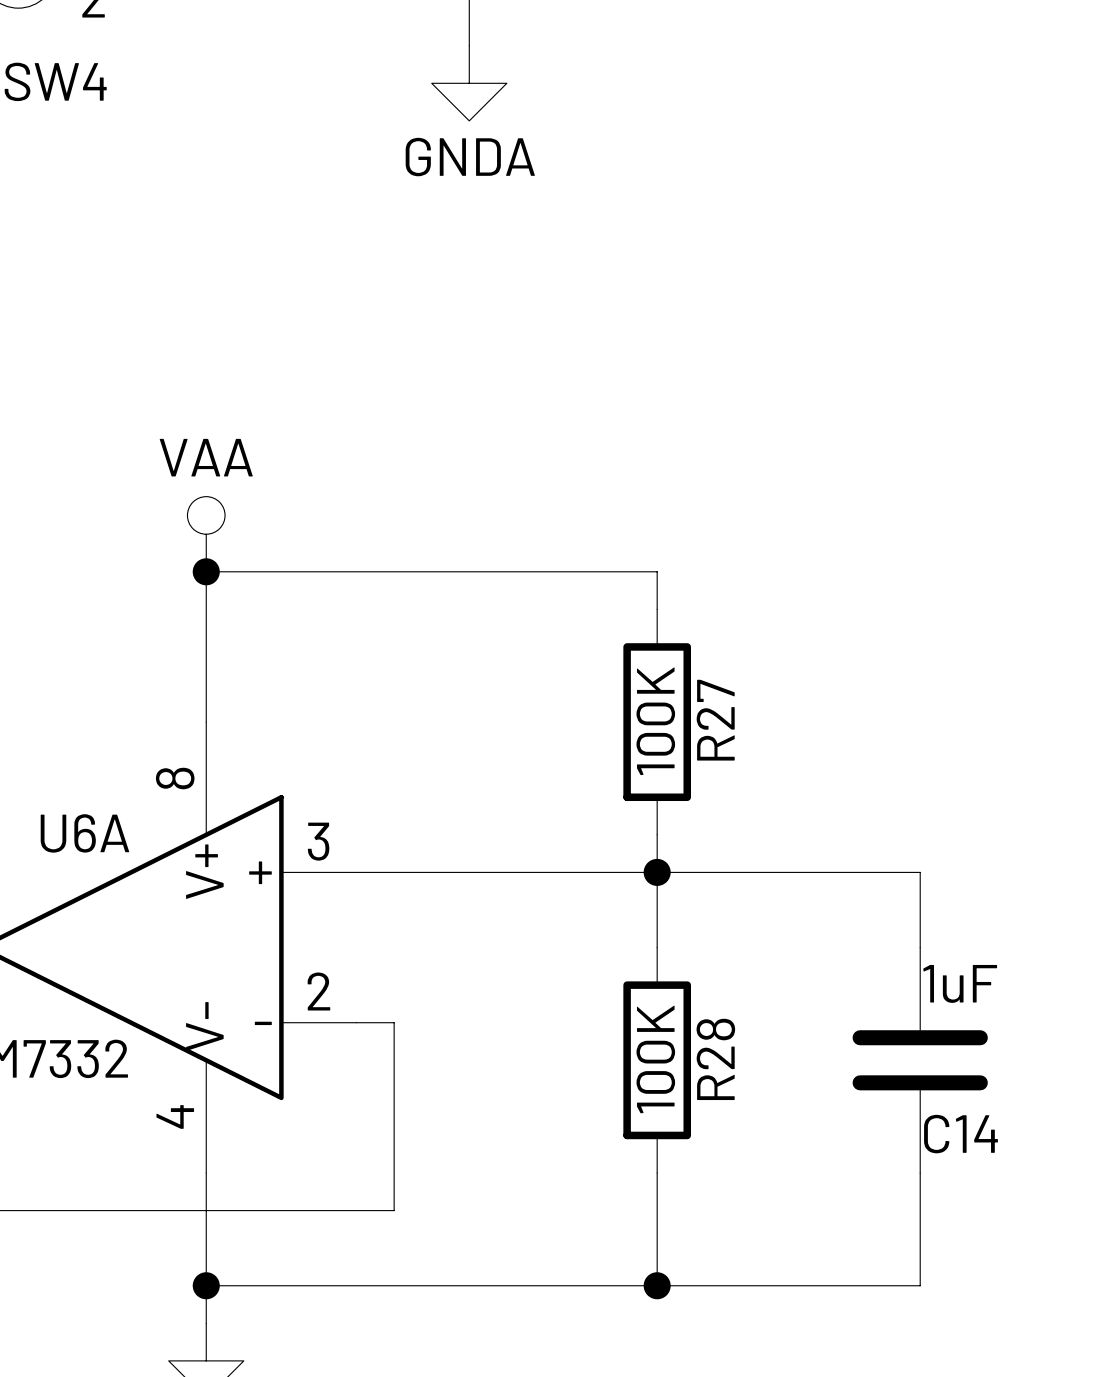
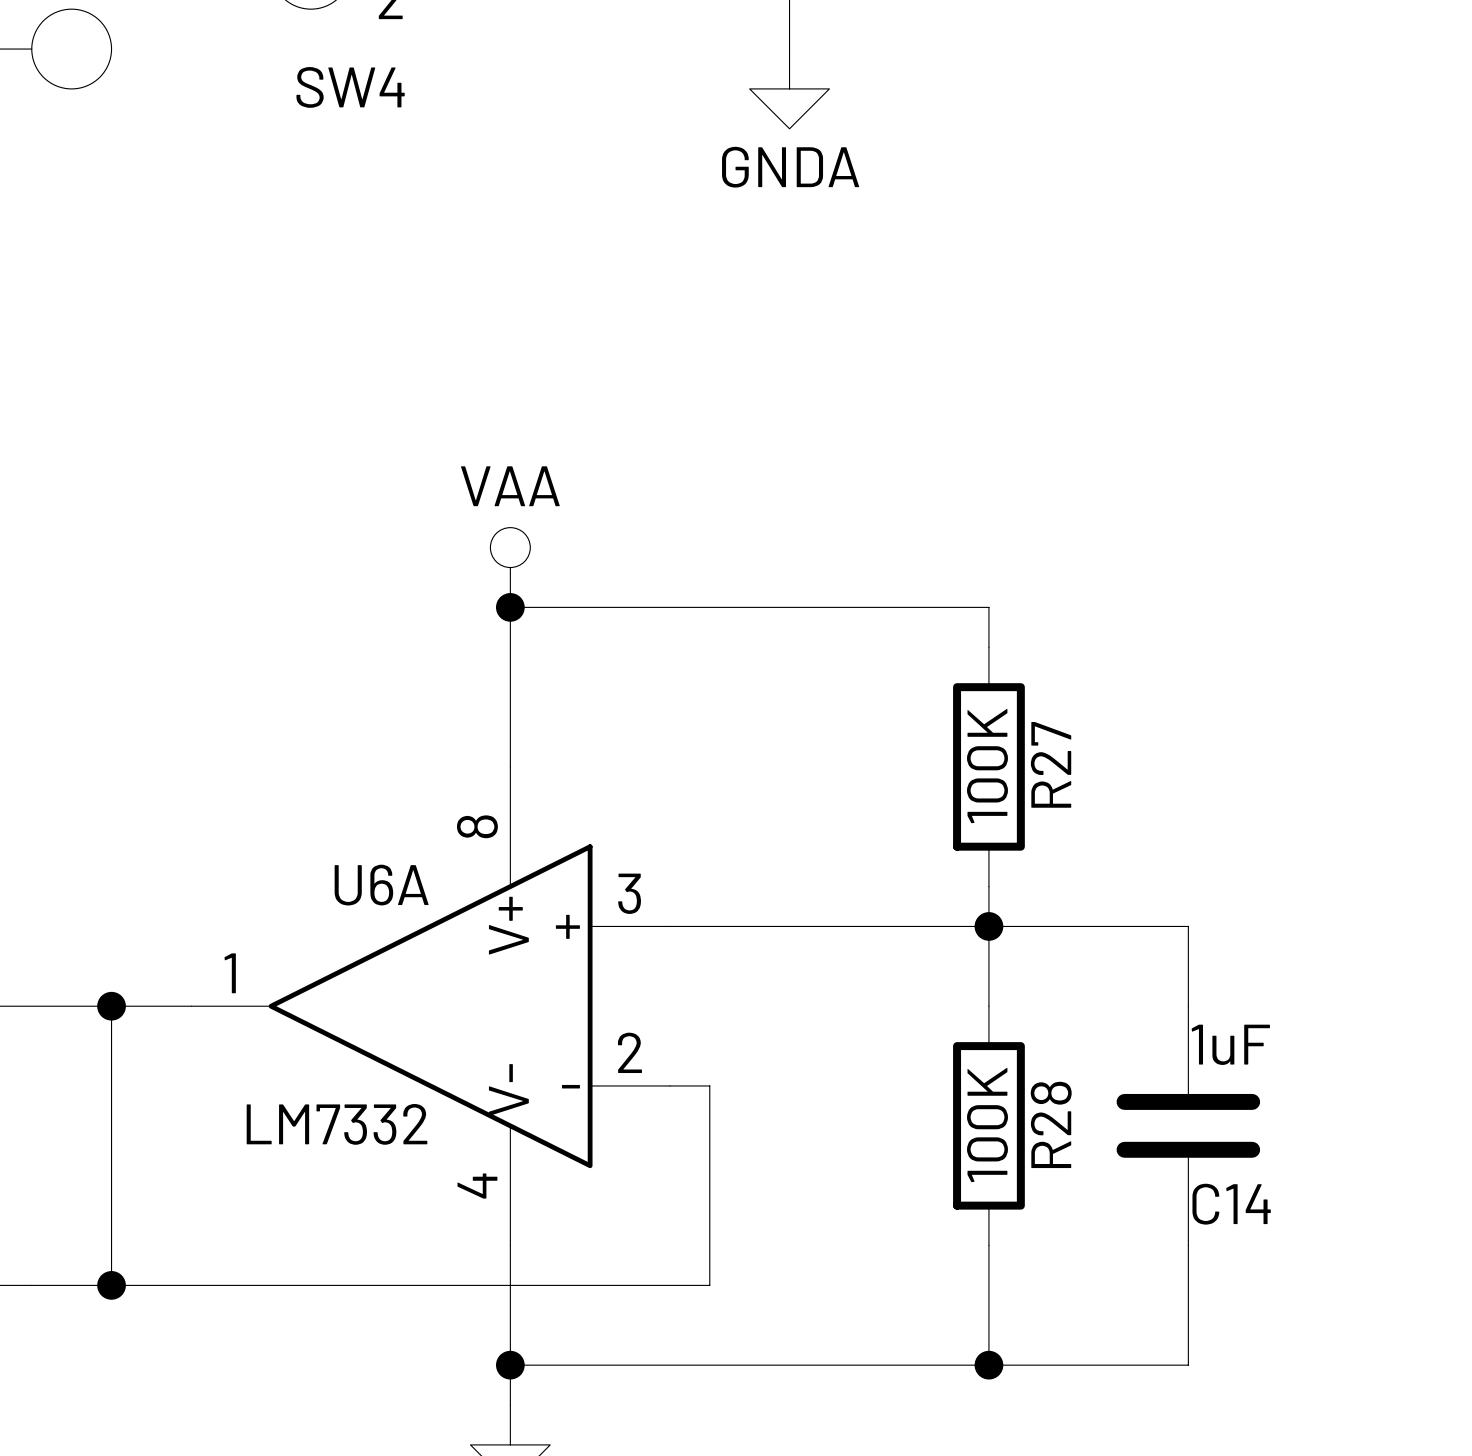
wire: (845, 872) (920, 872) (920, 947) -> (1188, 926) (1188, 1006)
C14 position: (920, 1060) -> (1188, 1125)
wire: (920, 1173) (920, 1285) (845, 1285) -> (1188, 1245) (1188, 1365)

